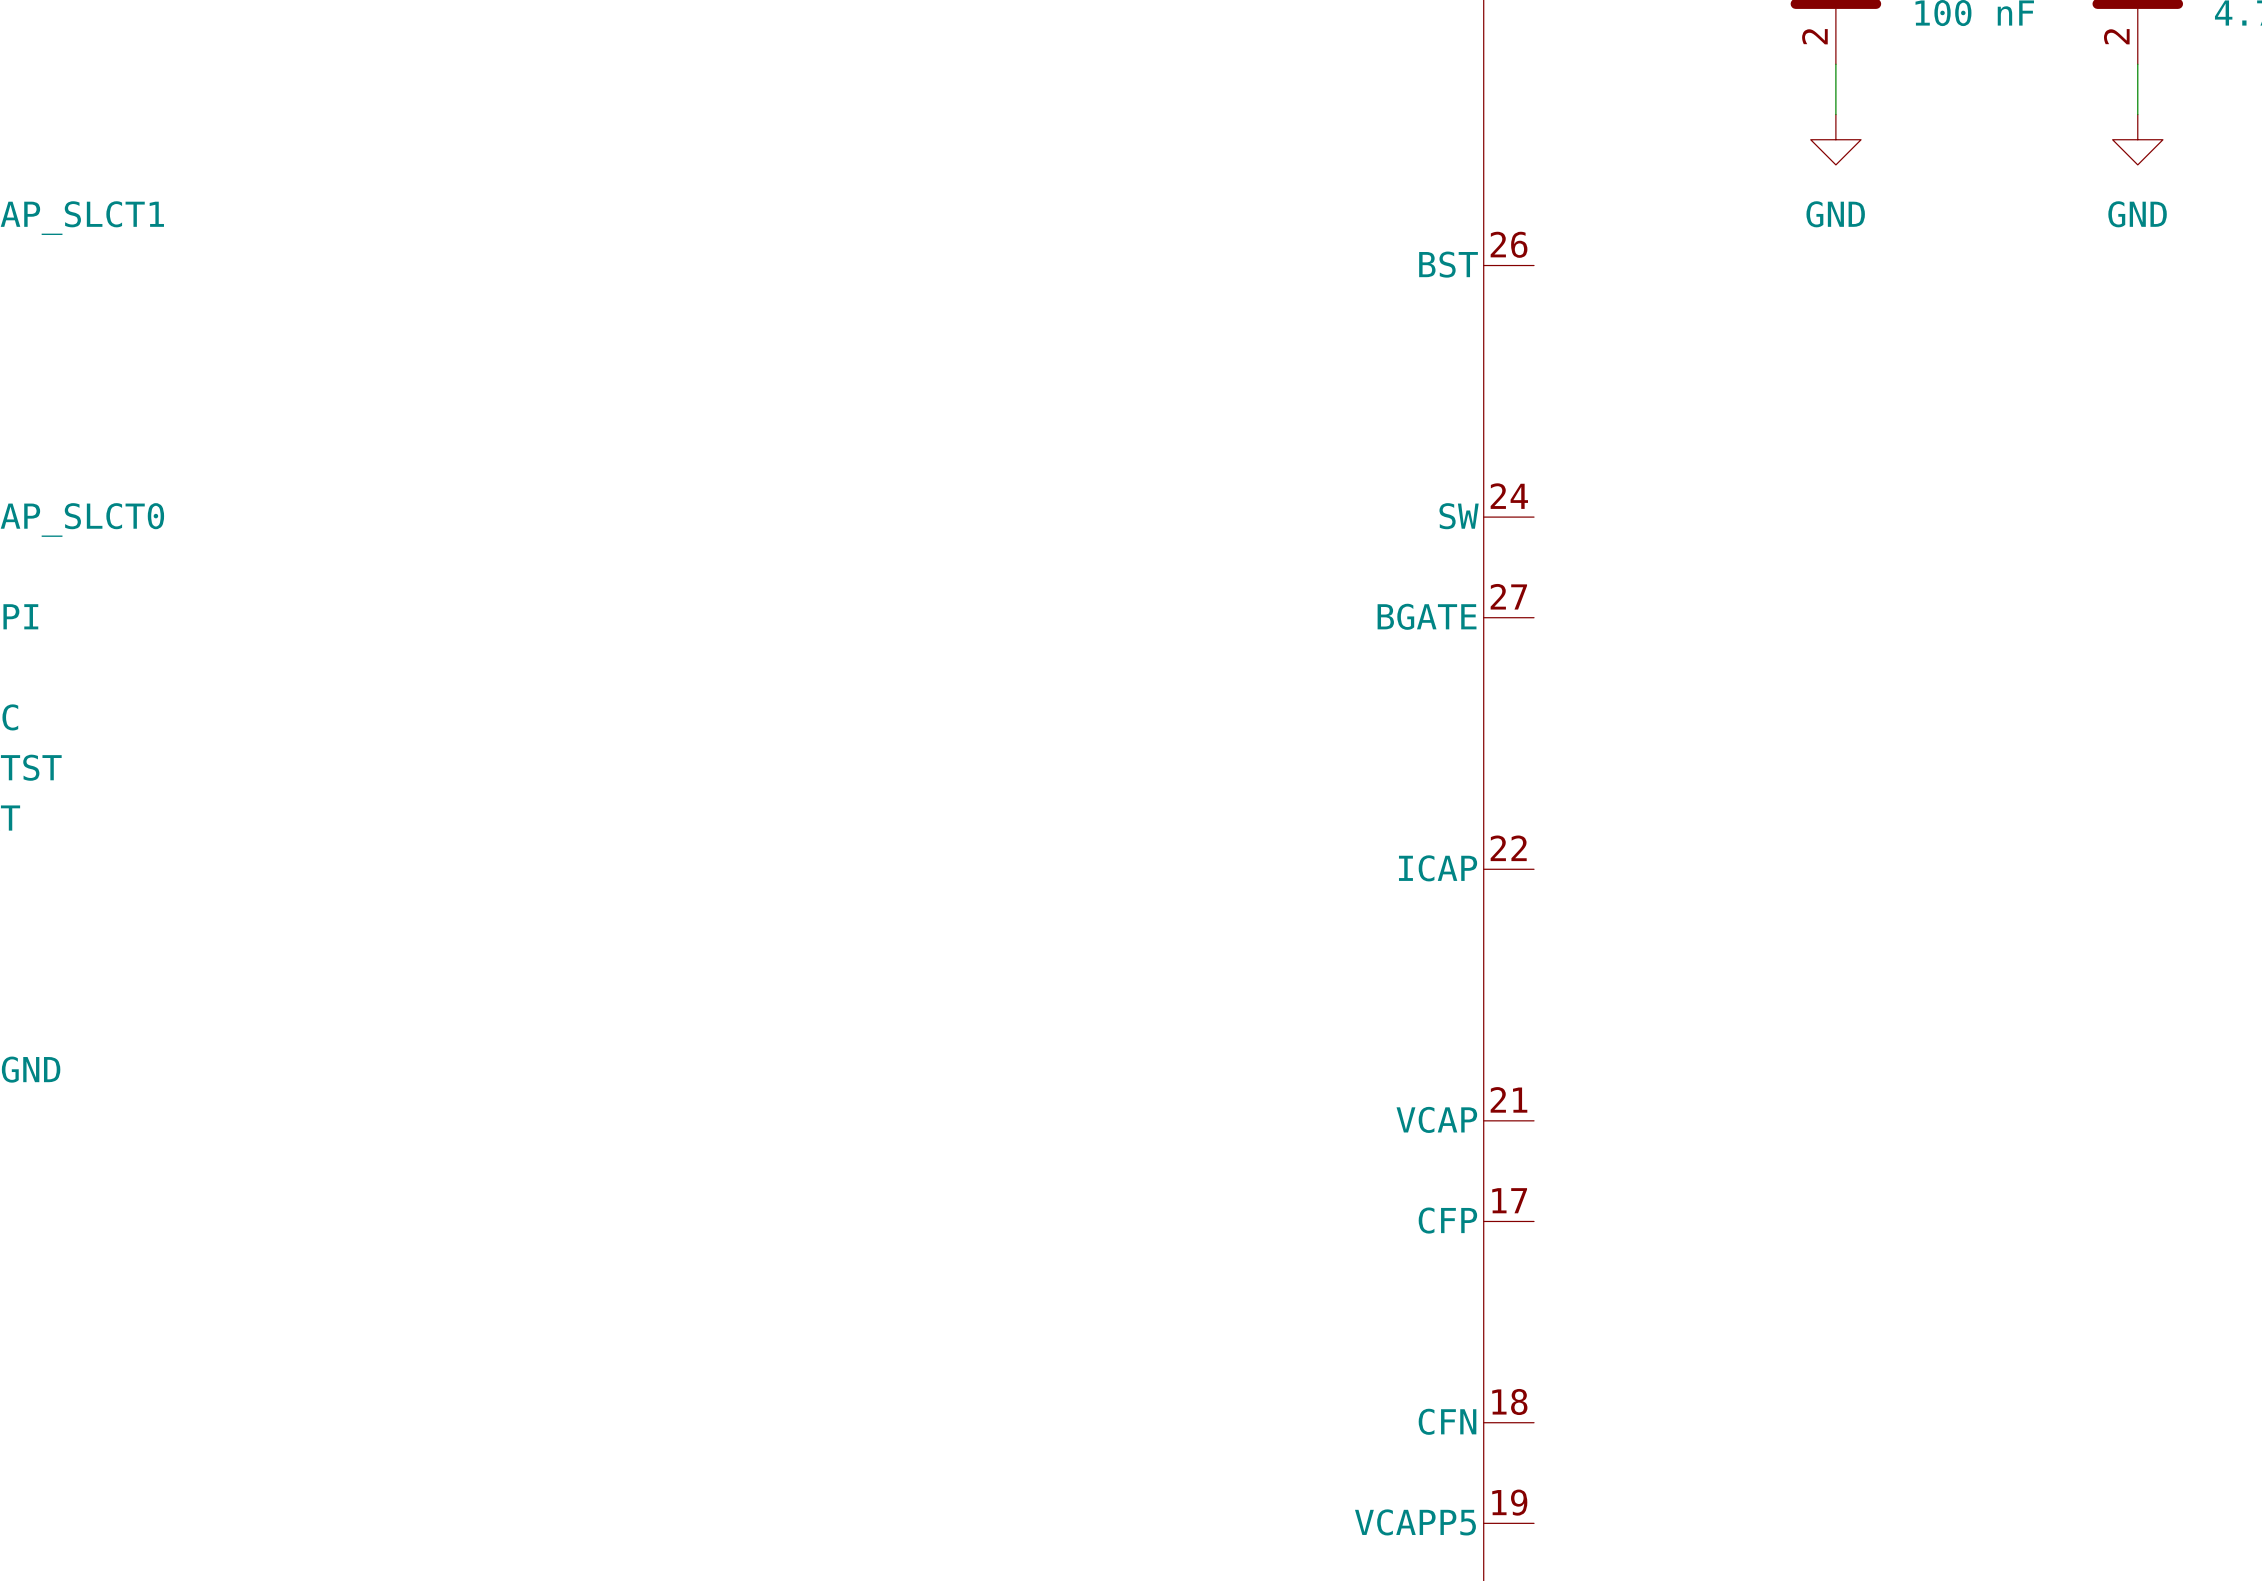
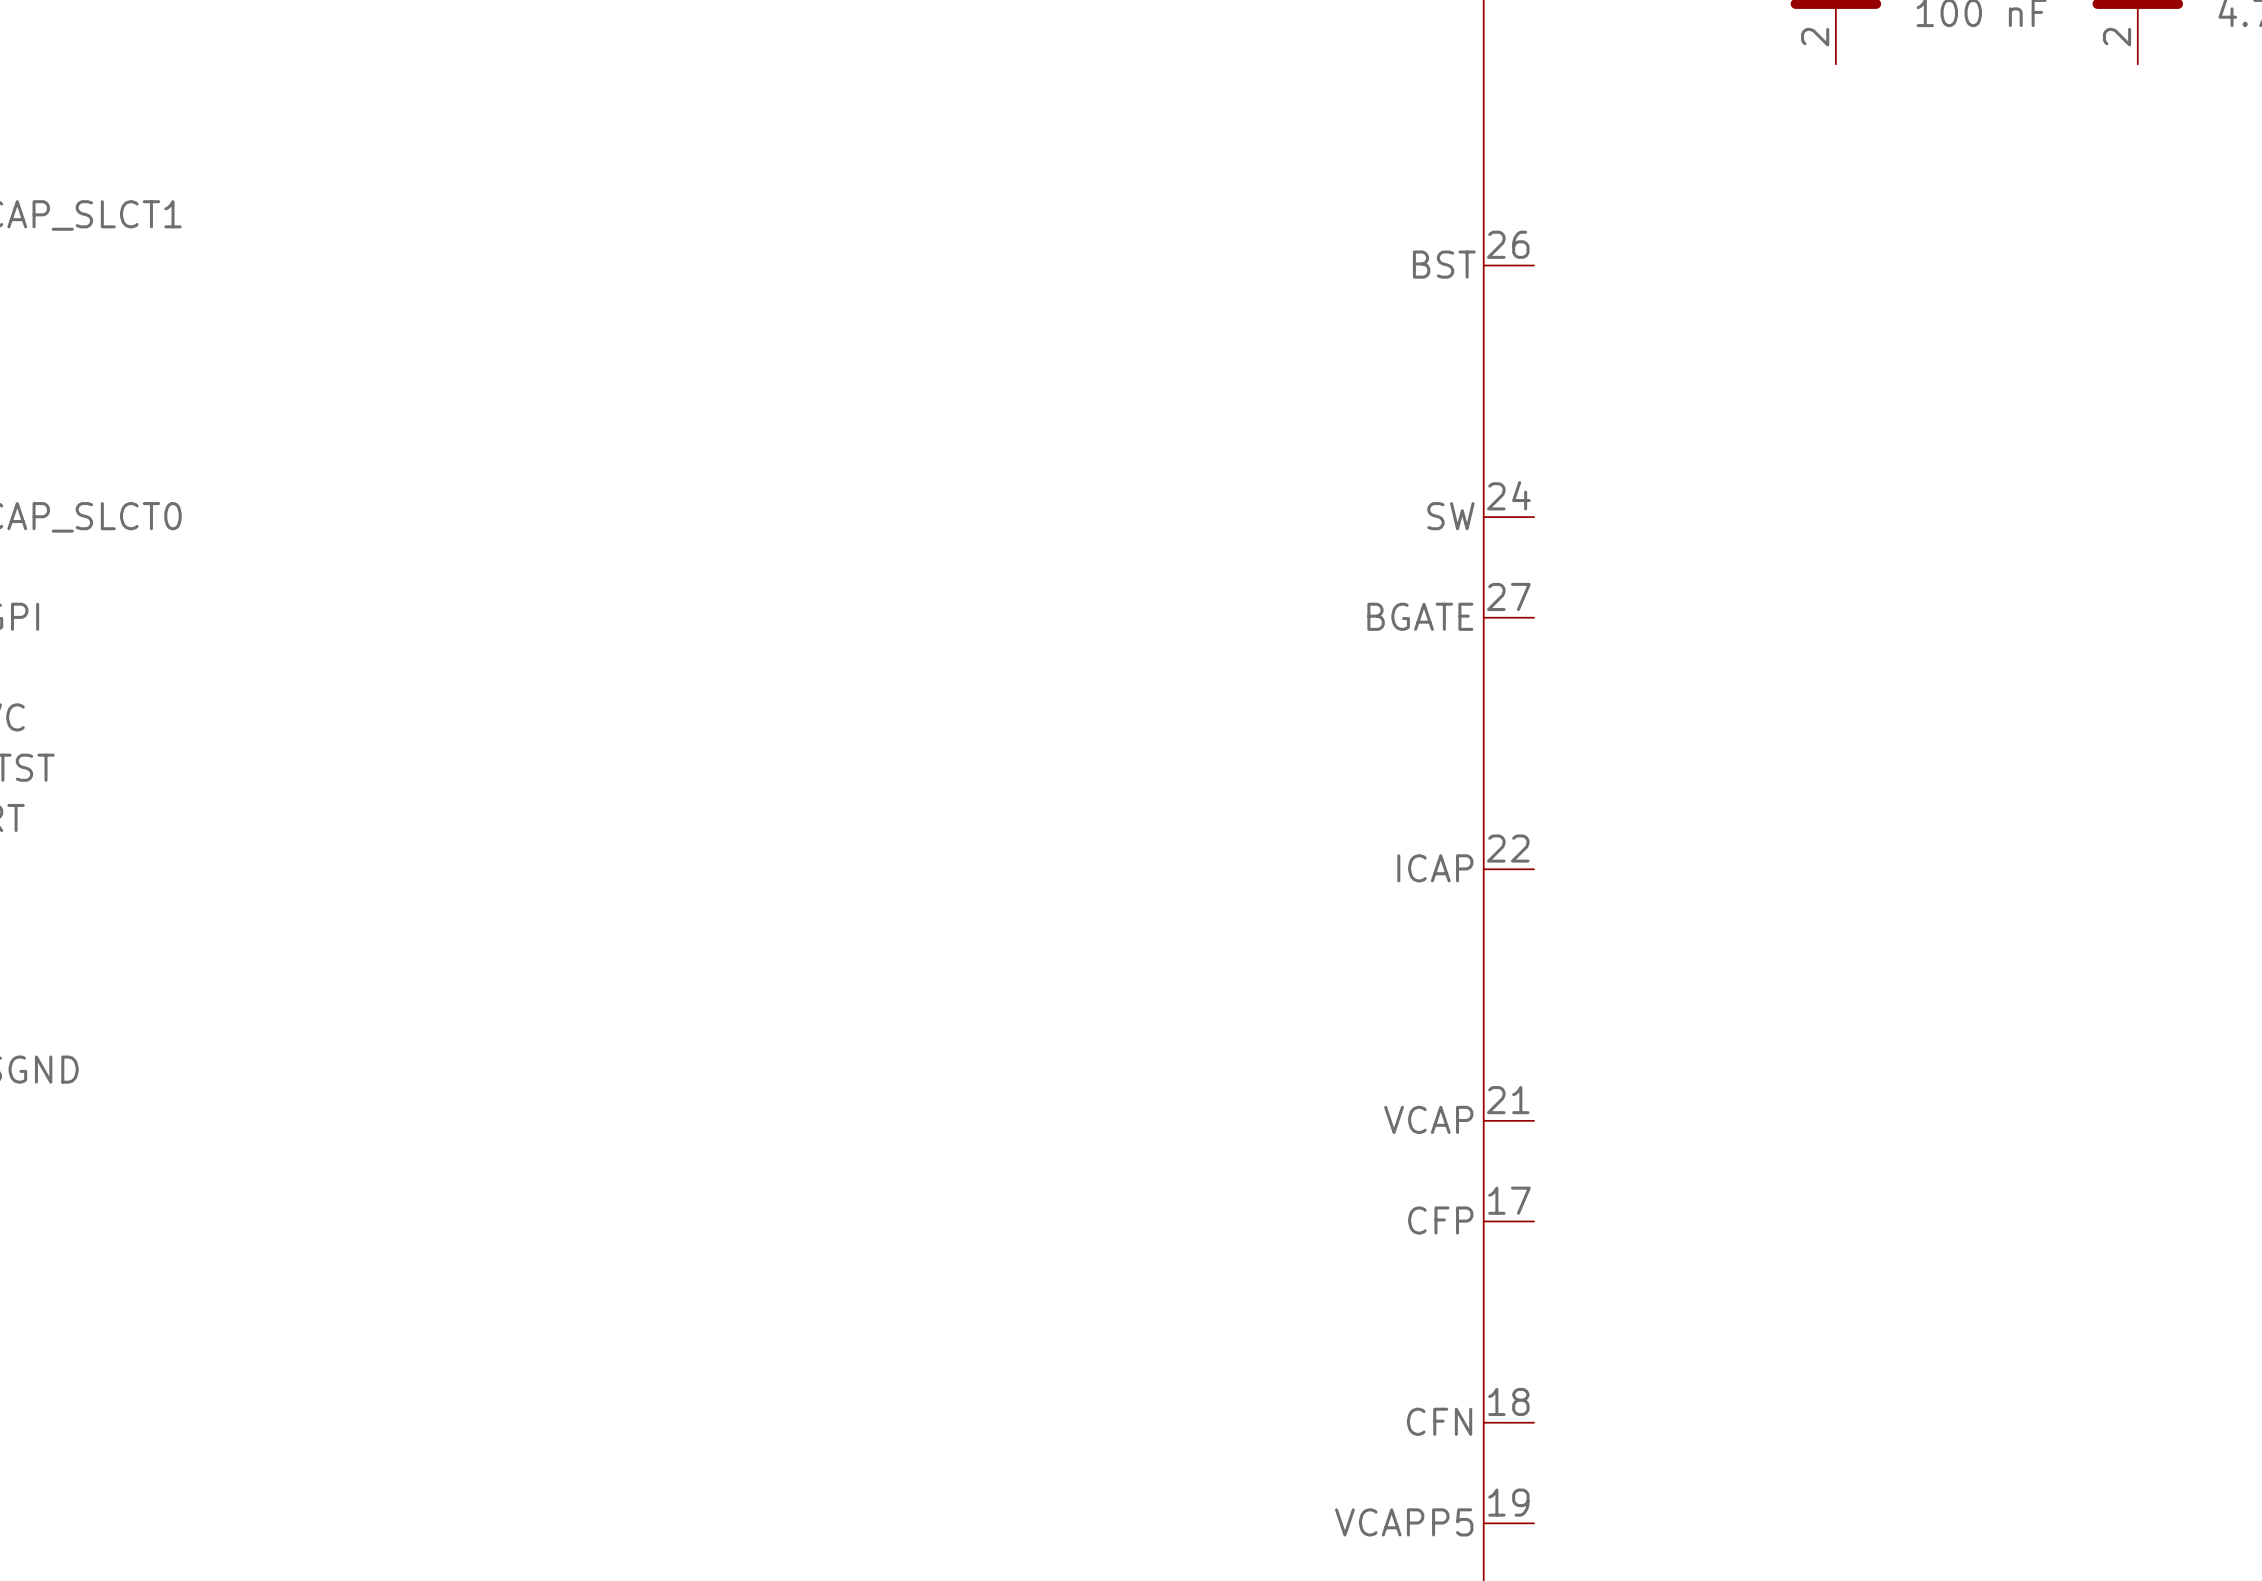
wire: (1835, 64) (1835, 114) -> none
wire: (2137, 64) (2137, 114) -> none
power symbol: GND (1835, 139) -> none
power symbol: GND (2137, 139) -> none

